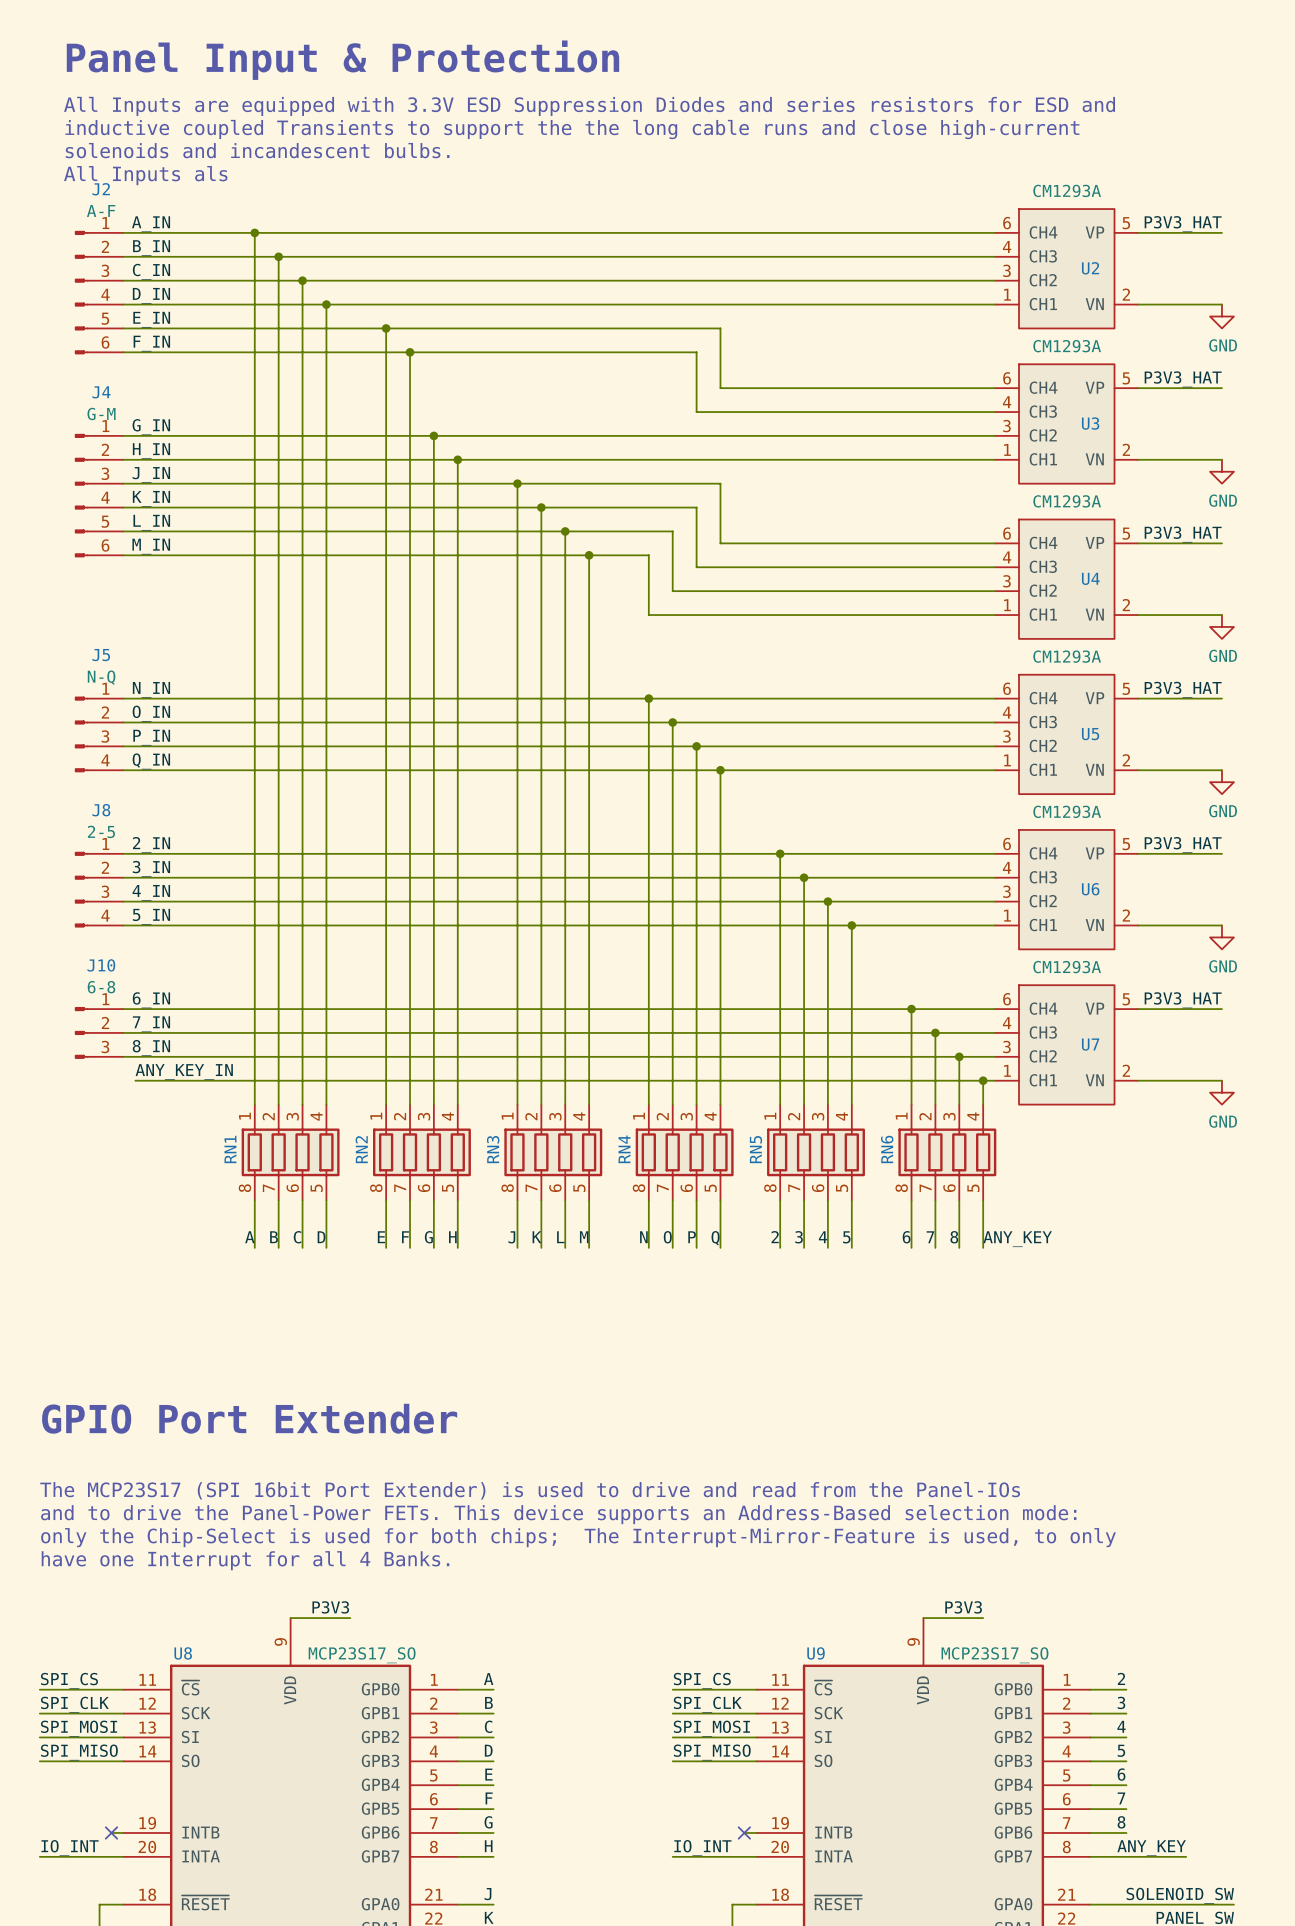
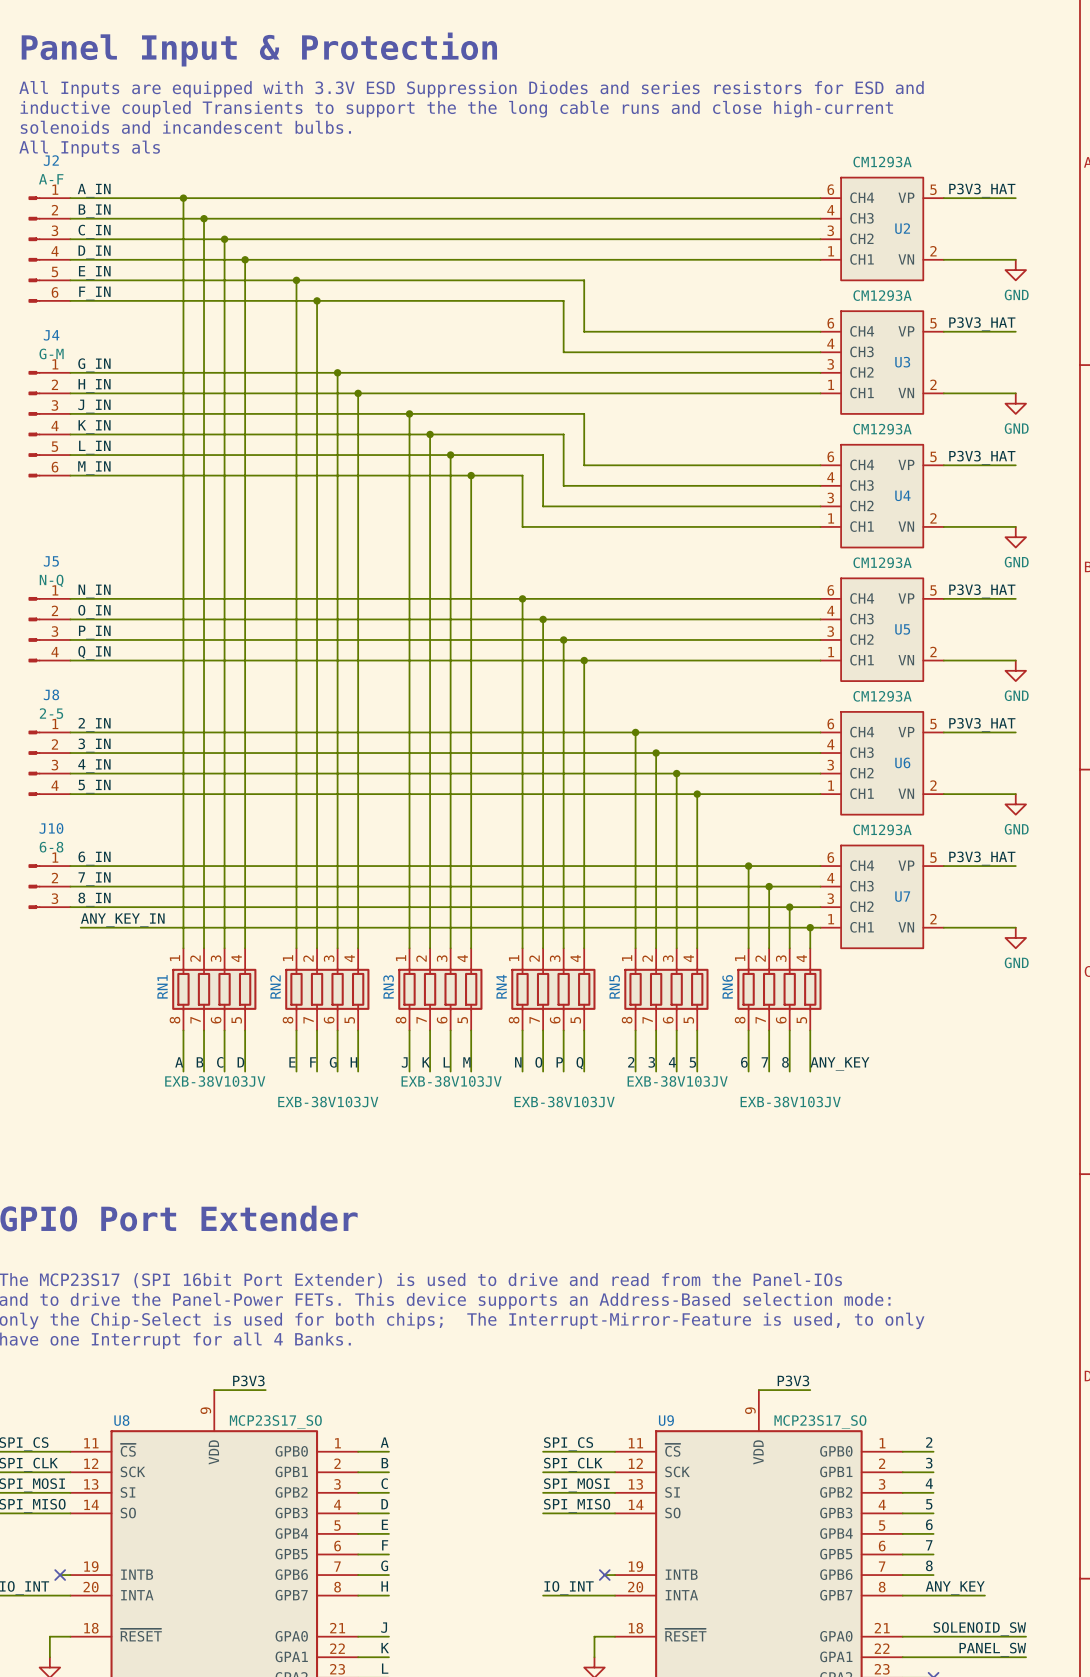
RN1 value: none -> EXB-38V103JV (215, 1081)
RN3 value: none -> EXB-38V103JV (451, 1081)
RN5 value: none -> EXB-38V103JV (677, 1081)
RN2 value: none -> EXB-38V103JV (328, 1102)
RN4 value: none -> EXB-38V103JV (564, 1102)
RN6 value: none -> EXB-38V103JV (790, 1102)

